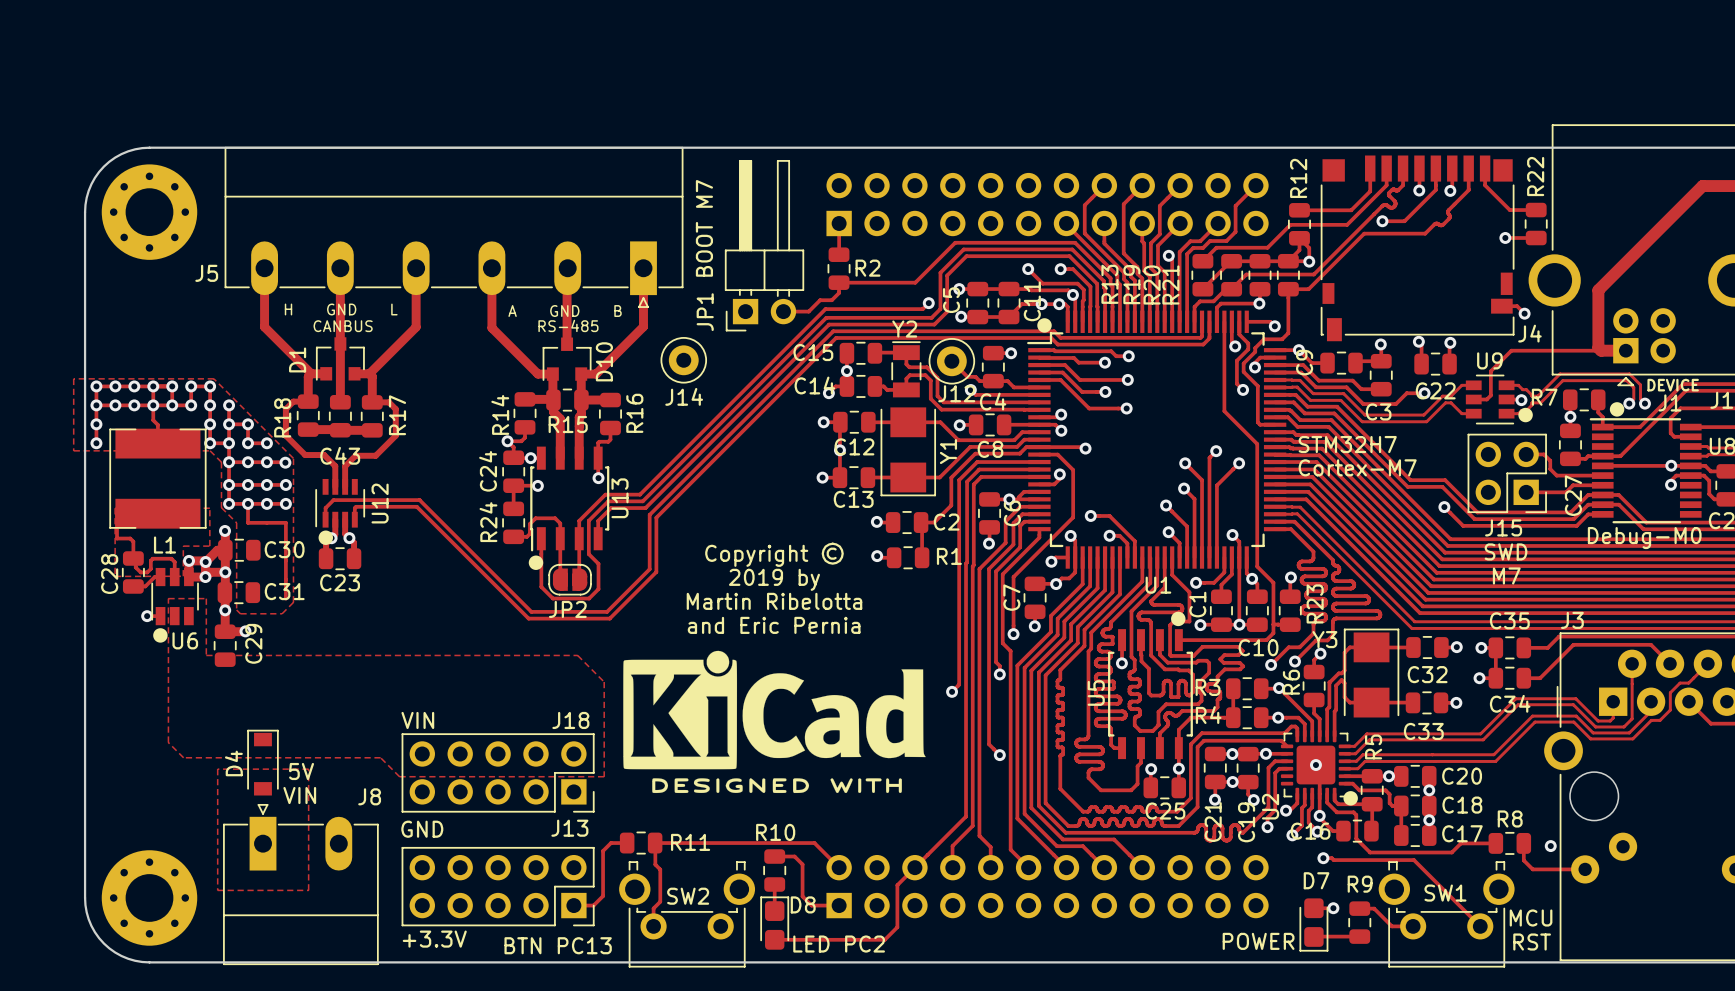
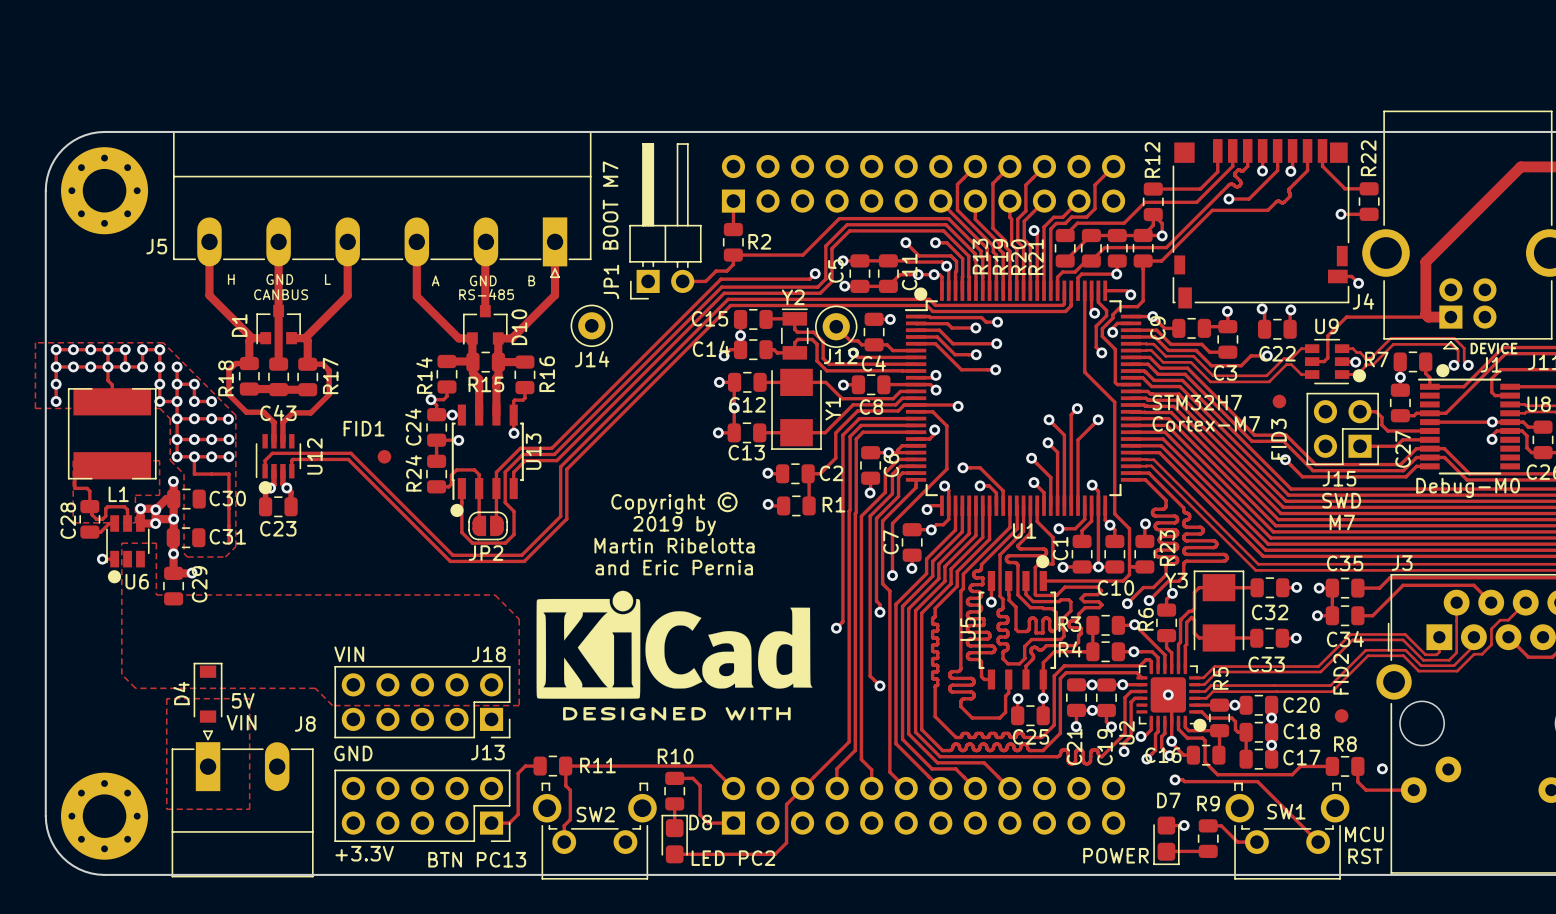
FID3: none -> (1279, 401)
FID1: none -> (384, 456)
FID2: none -> (1341, 715)

